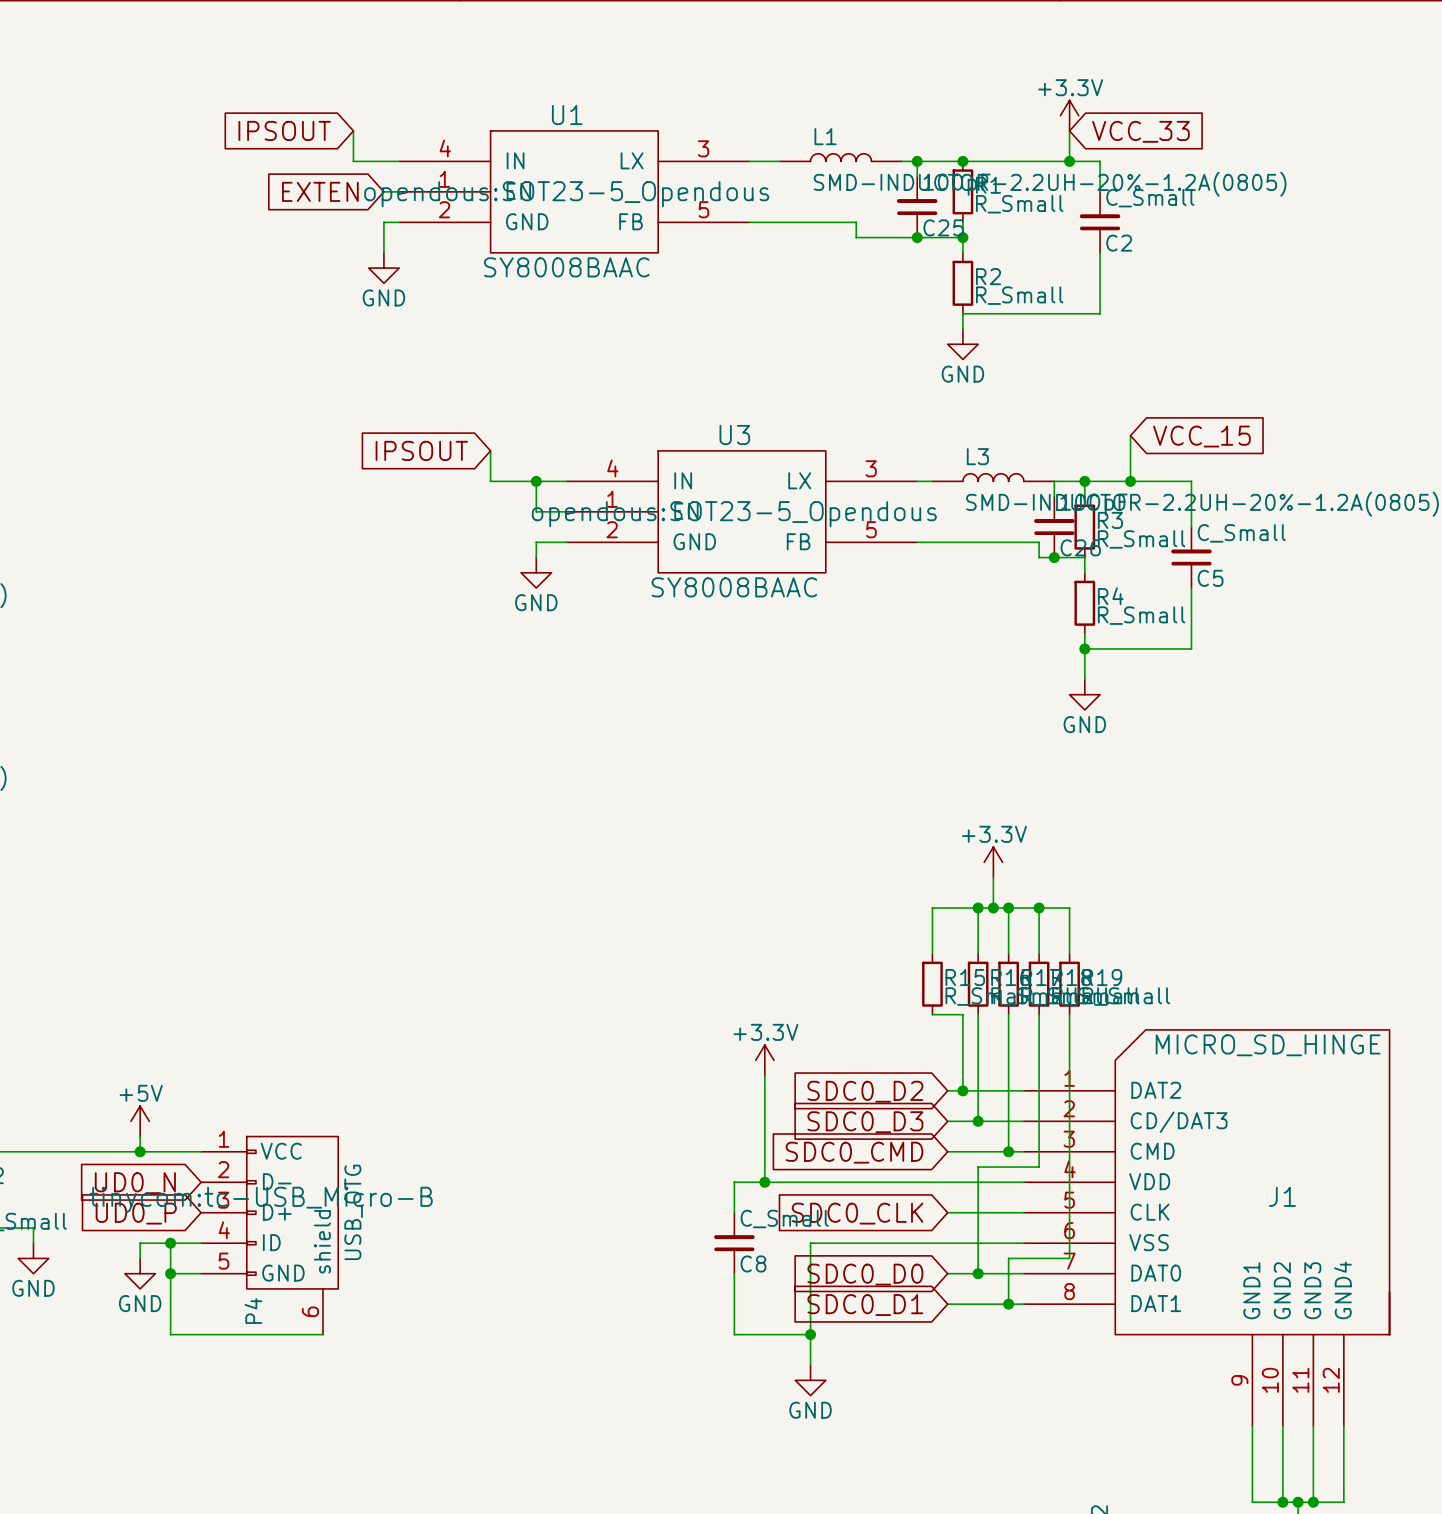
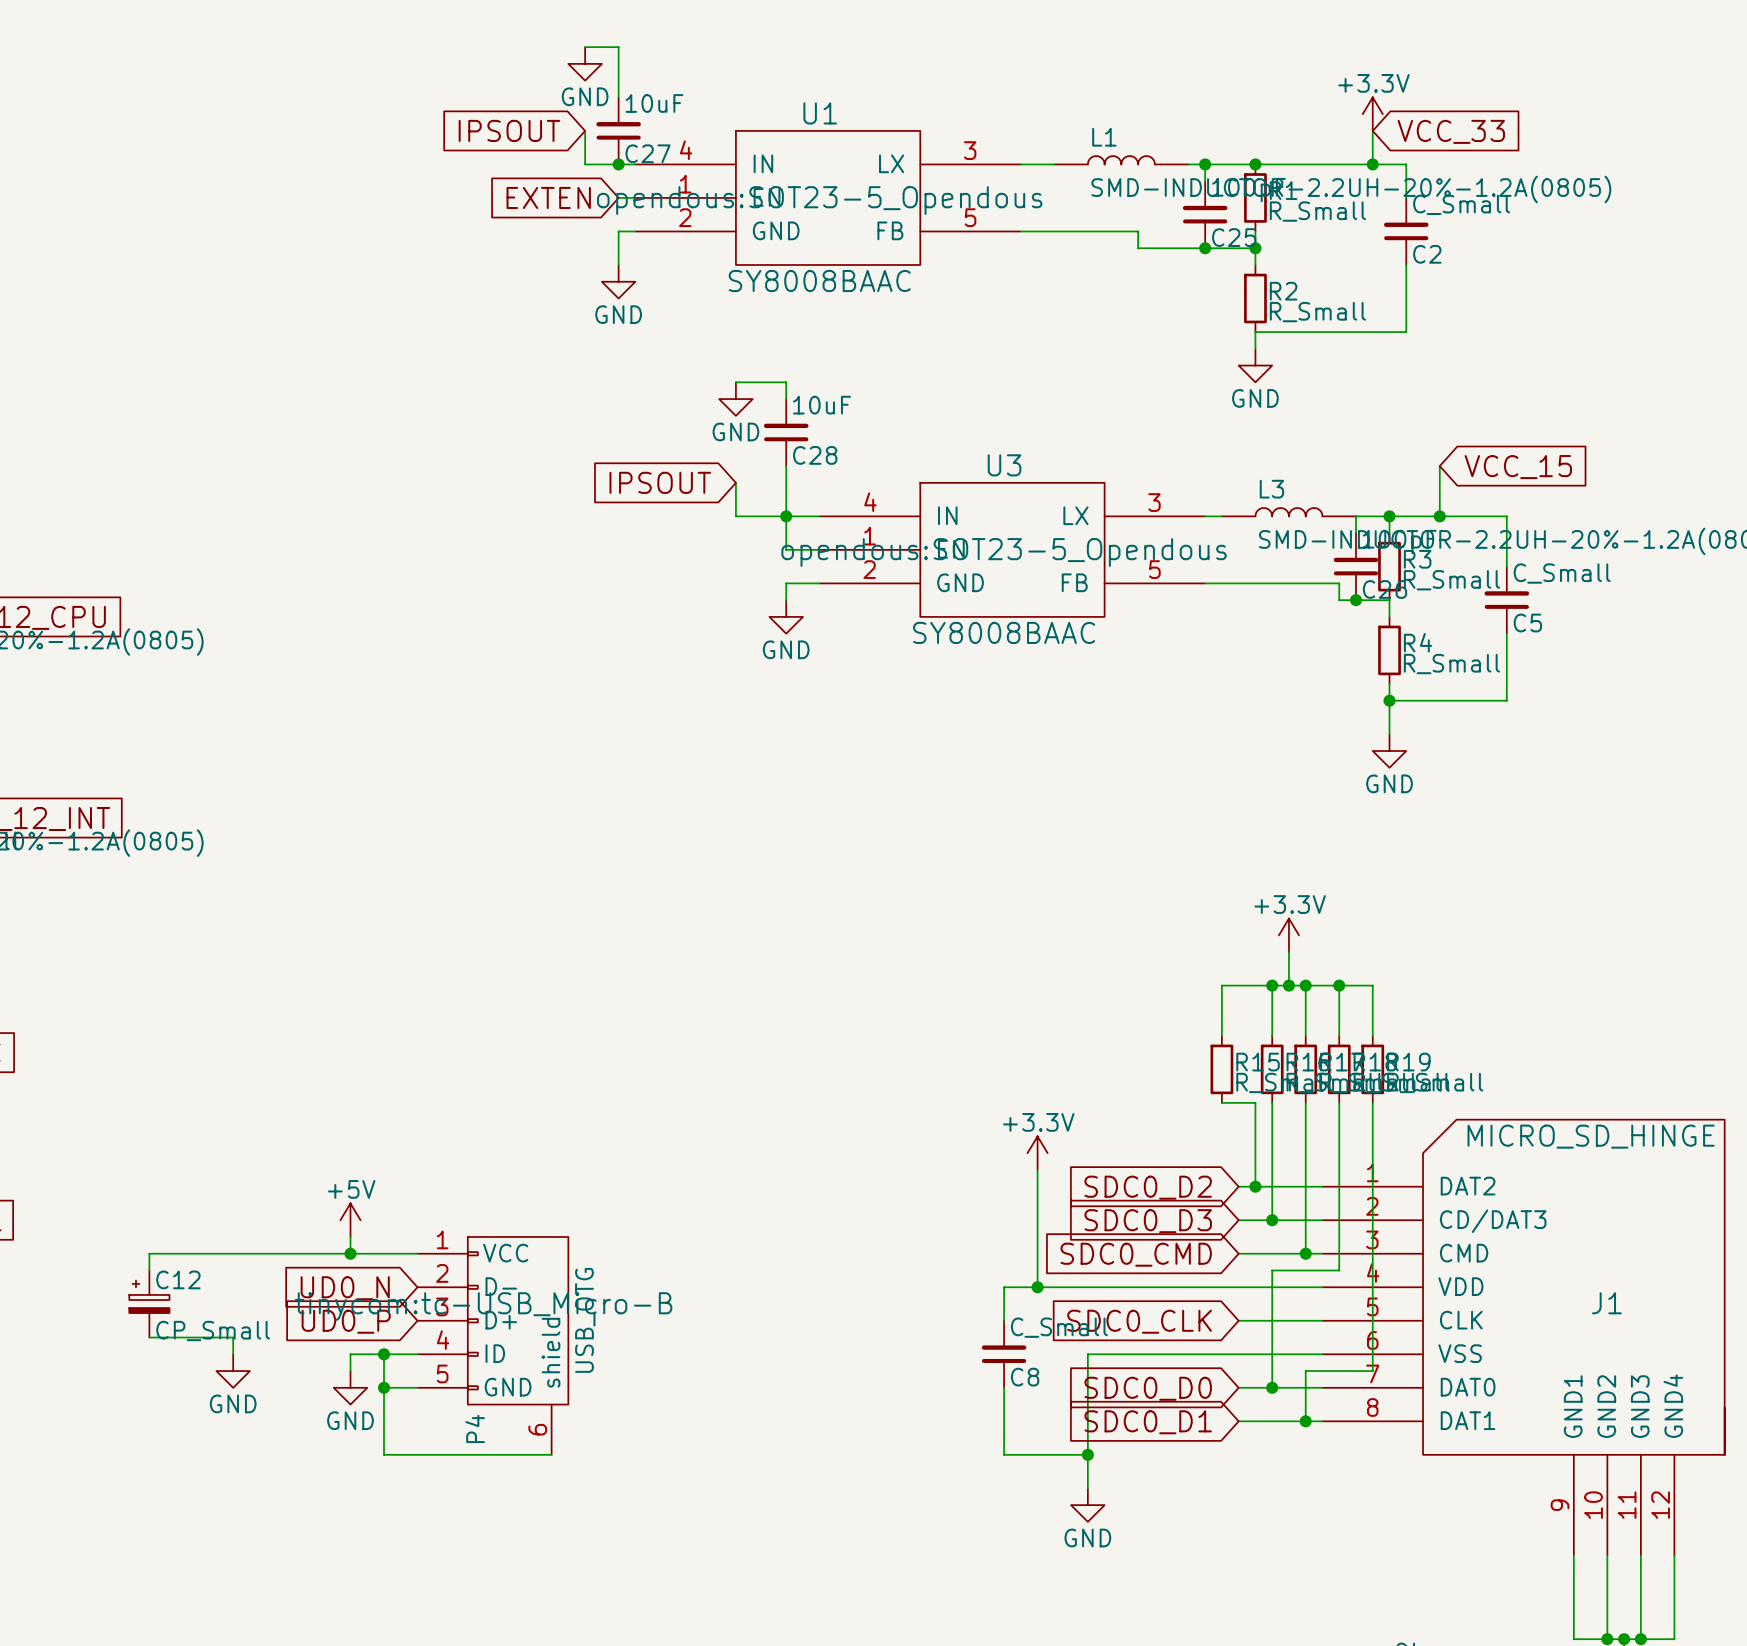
wire: none -> (585, 47) (618, 47) (618, 97)
power symbol: none -> GND (585, 63)
C27: none -> 10uF (618, 130)
junction: none -> (618, 164)
wire: none -> (735, 382) (786, 382) (786, 399)
power symbol: none -> GND (735, 399)
C28: none -> 10uF (786, 432)
wire: none -> (786, 466) (786, 516)

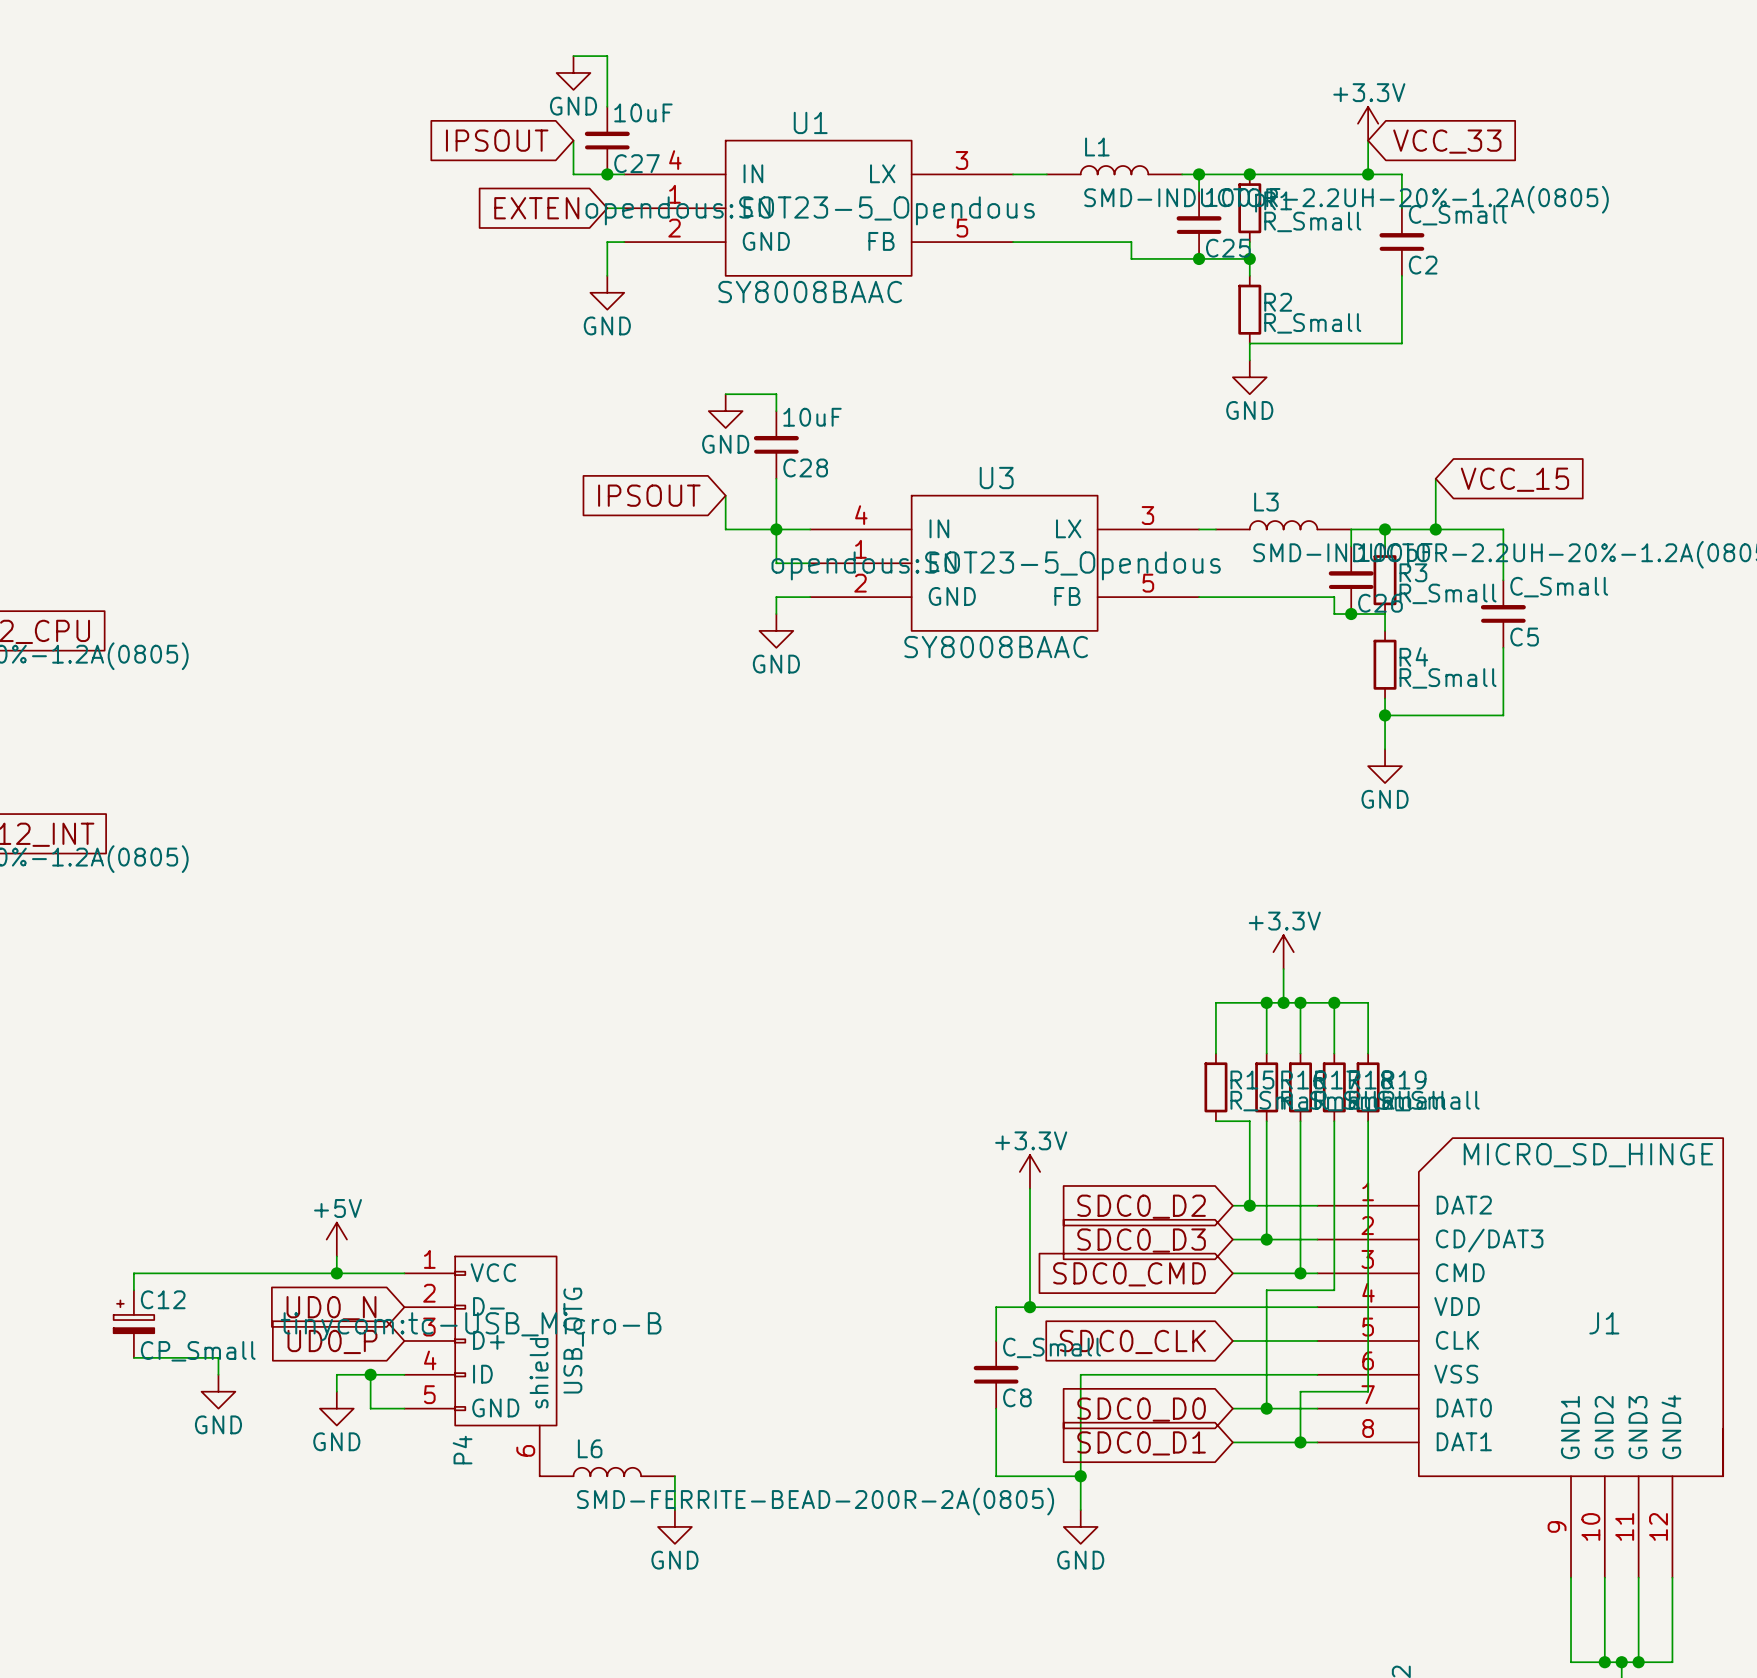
wire: (384, 1387) (384, 1454) (551, 1454) -> none
junction: (384, 1387) -> none
L6: none -> SMD-FERRITE-BEAD-200R-2A(0805) (607, 1472)
wire: none -> (674, 1476) (674, 1510)
power symbol: none -> GND (674, 1526)

